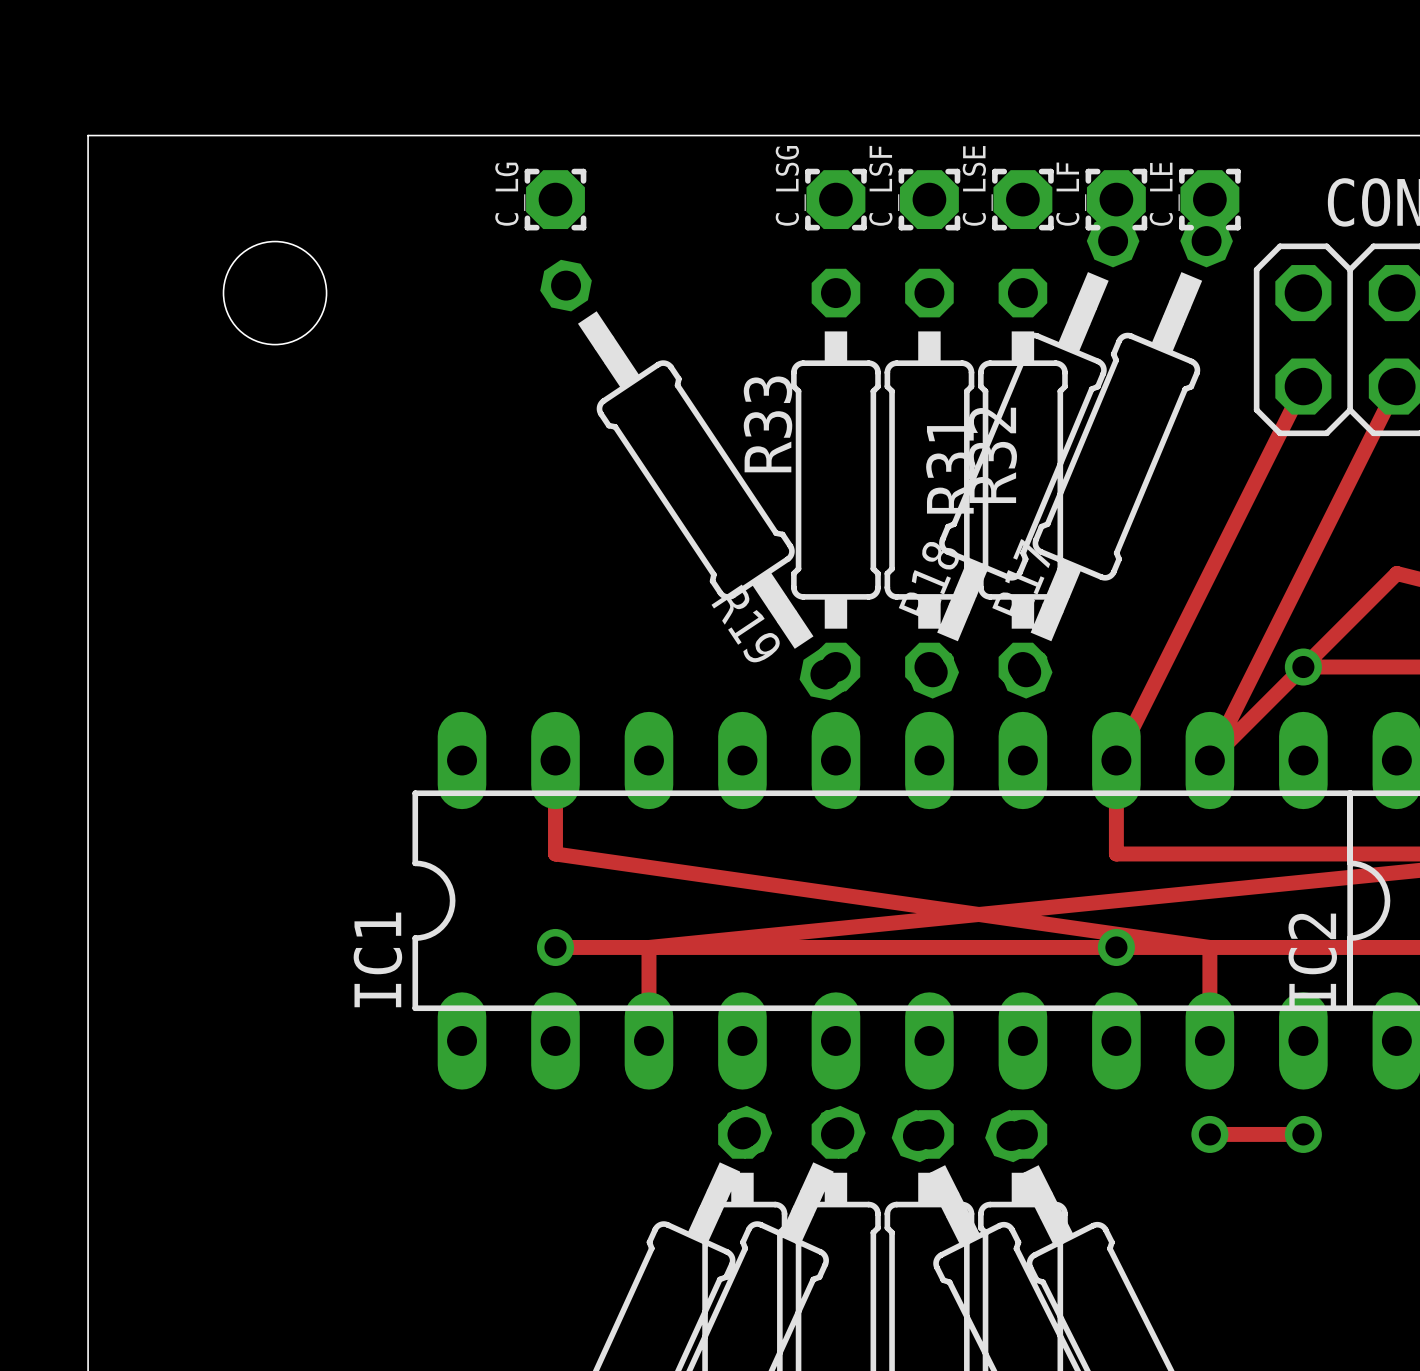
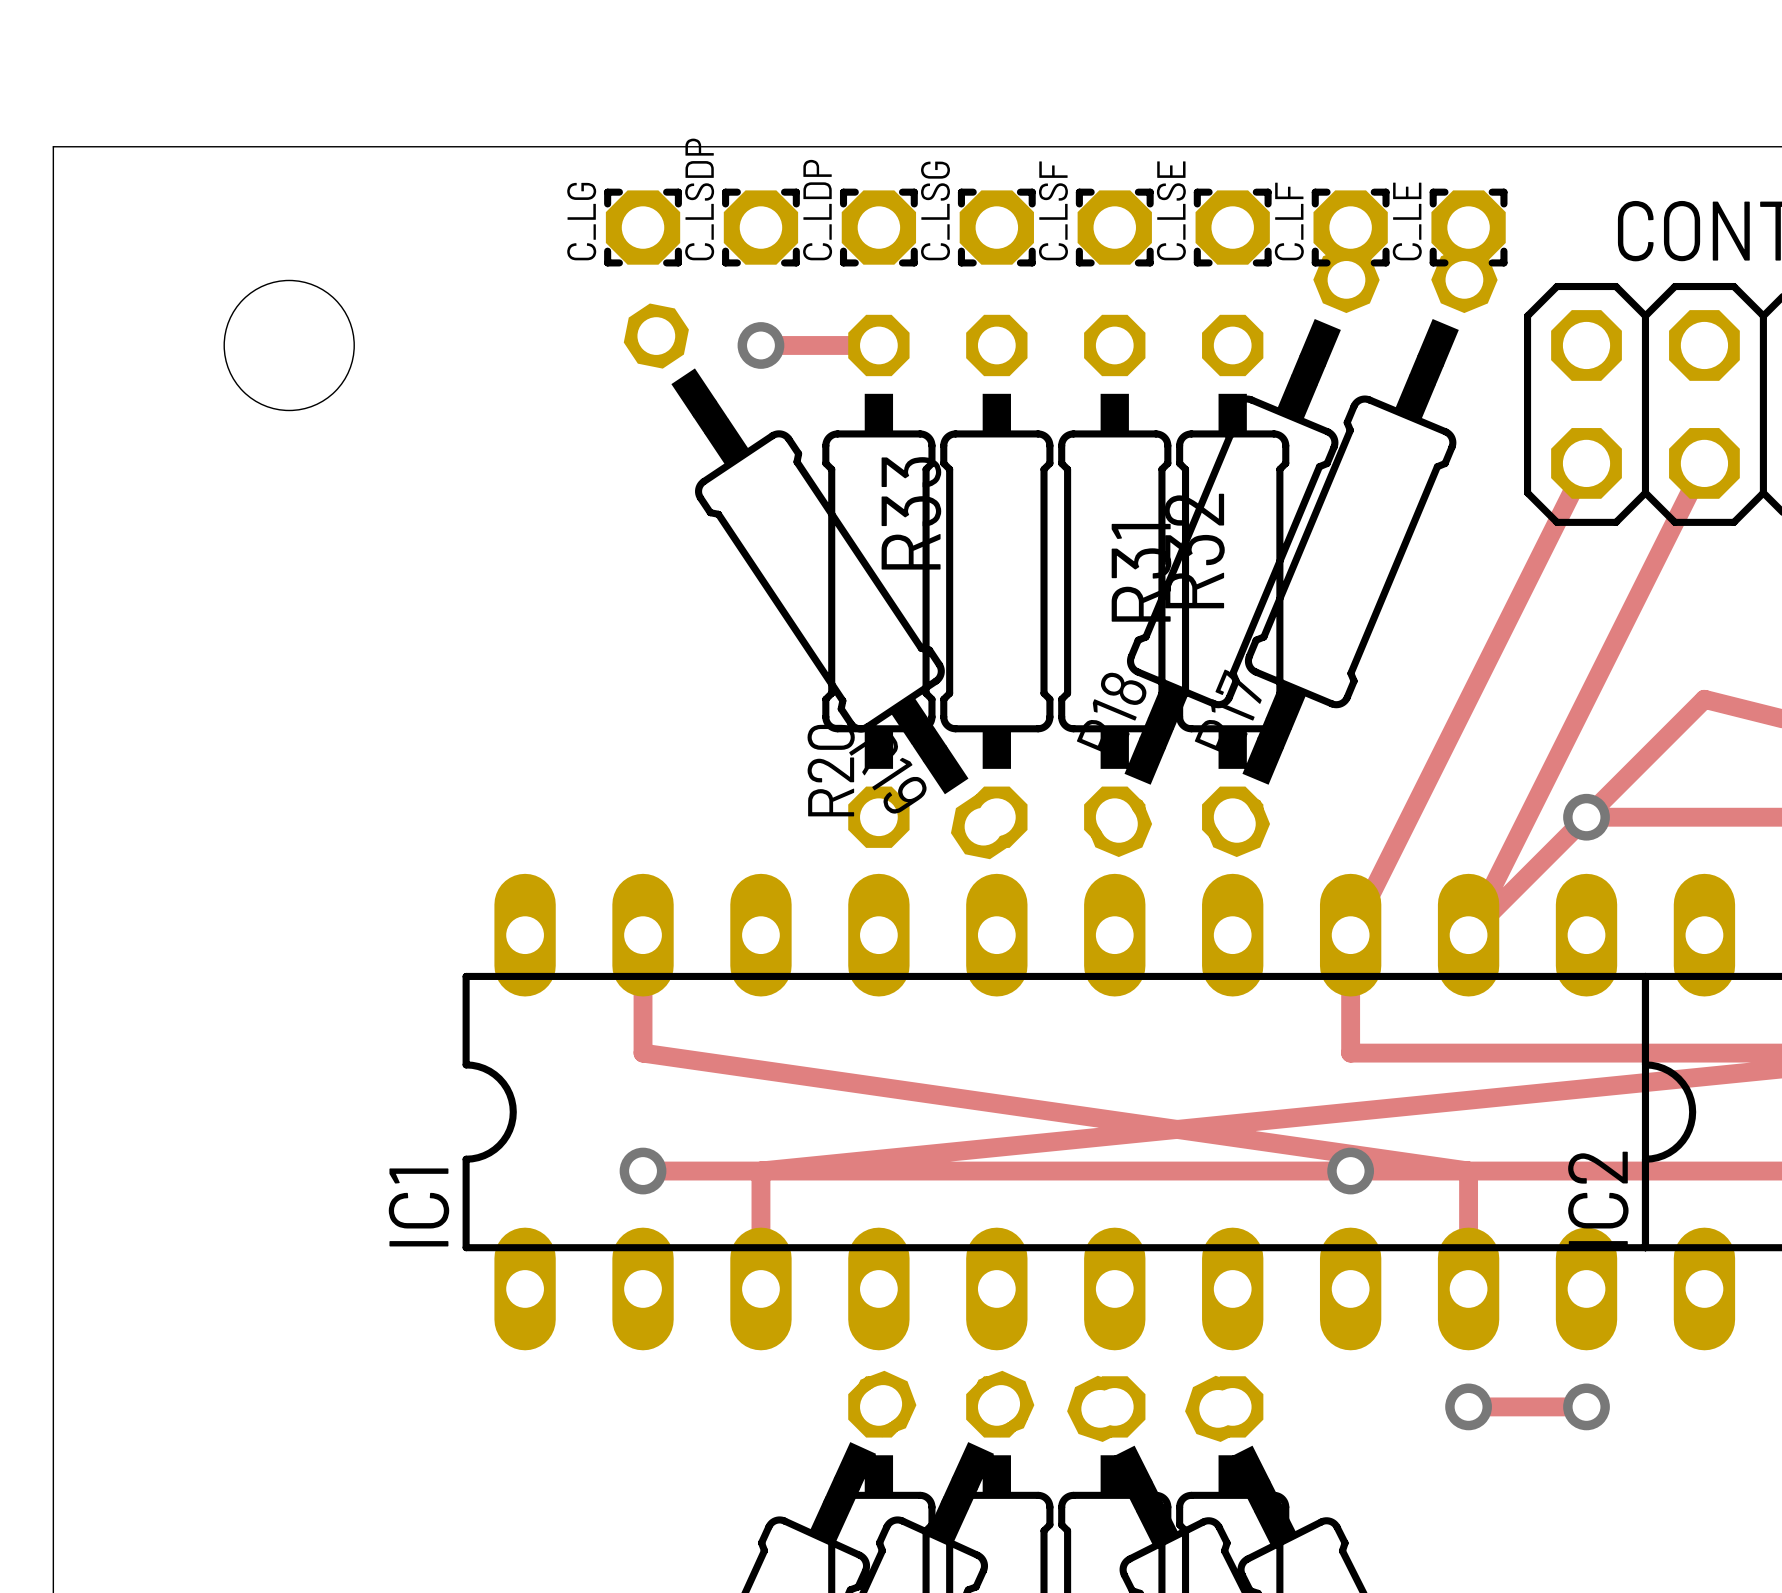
C_LSDP: none -> (760, 227)
C_LDP: none -> (878, 227)
track: none -> (760, 345) (878, 345)
via: none -> (760, 345)
R20: none -> (878, 581)

